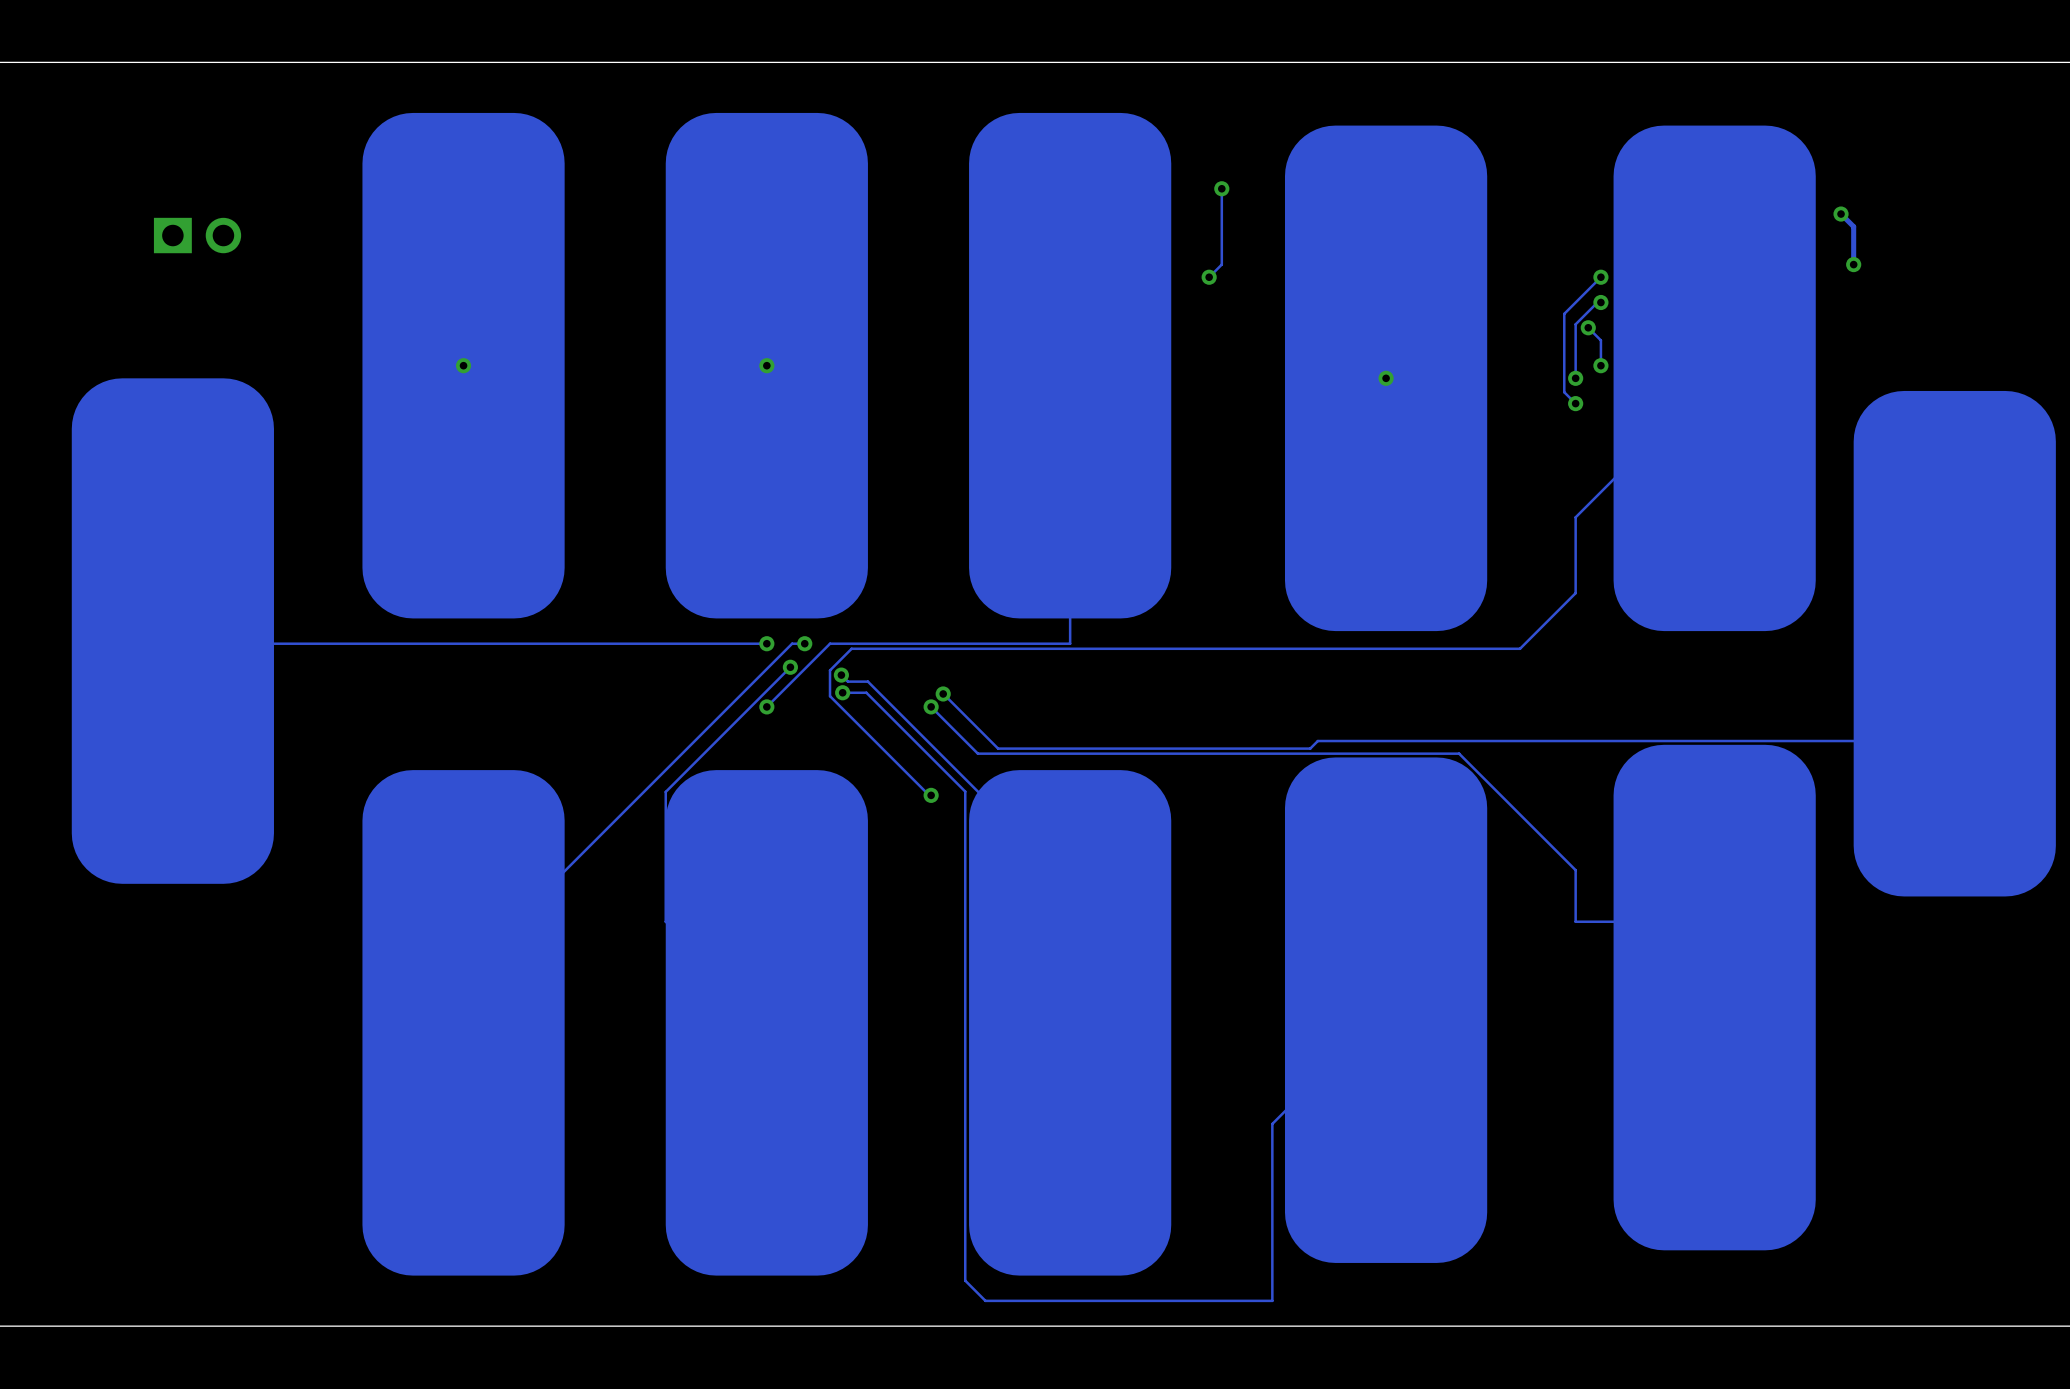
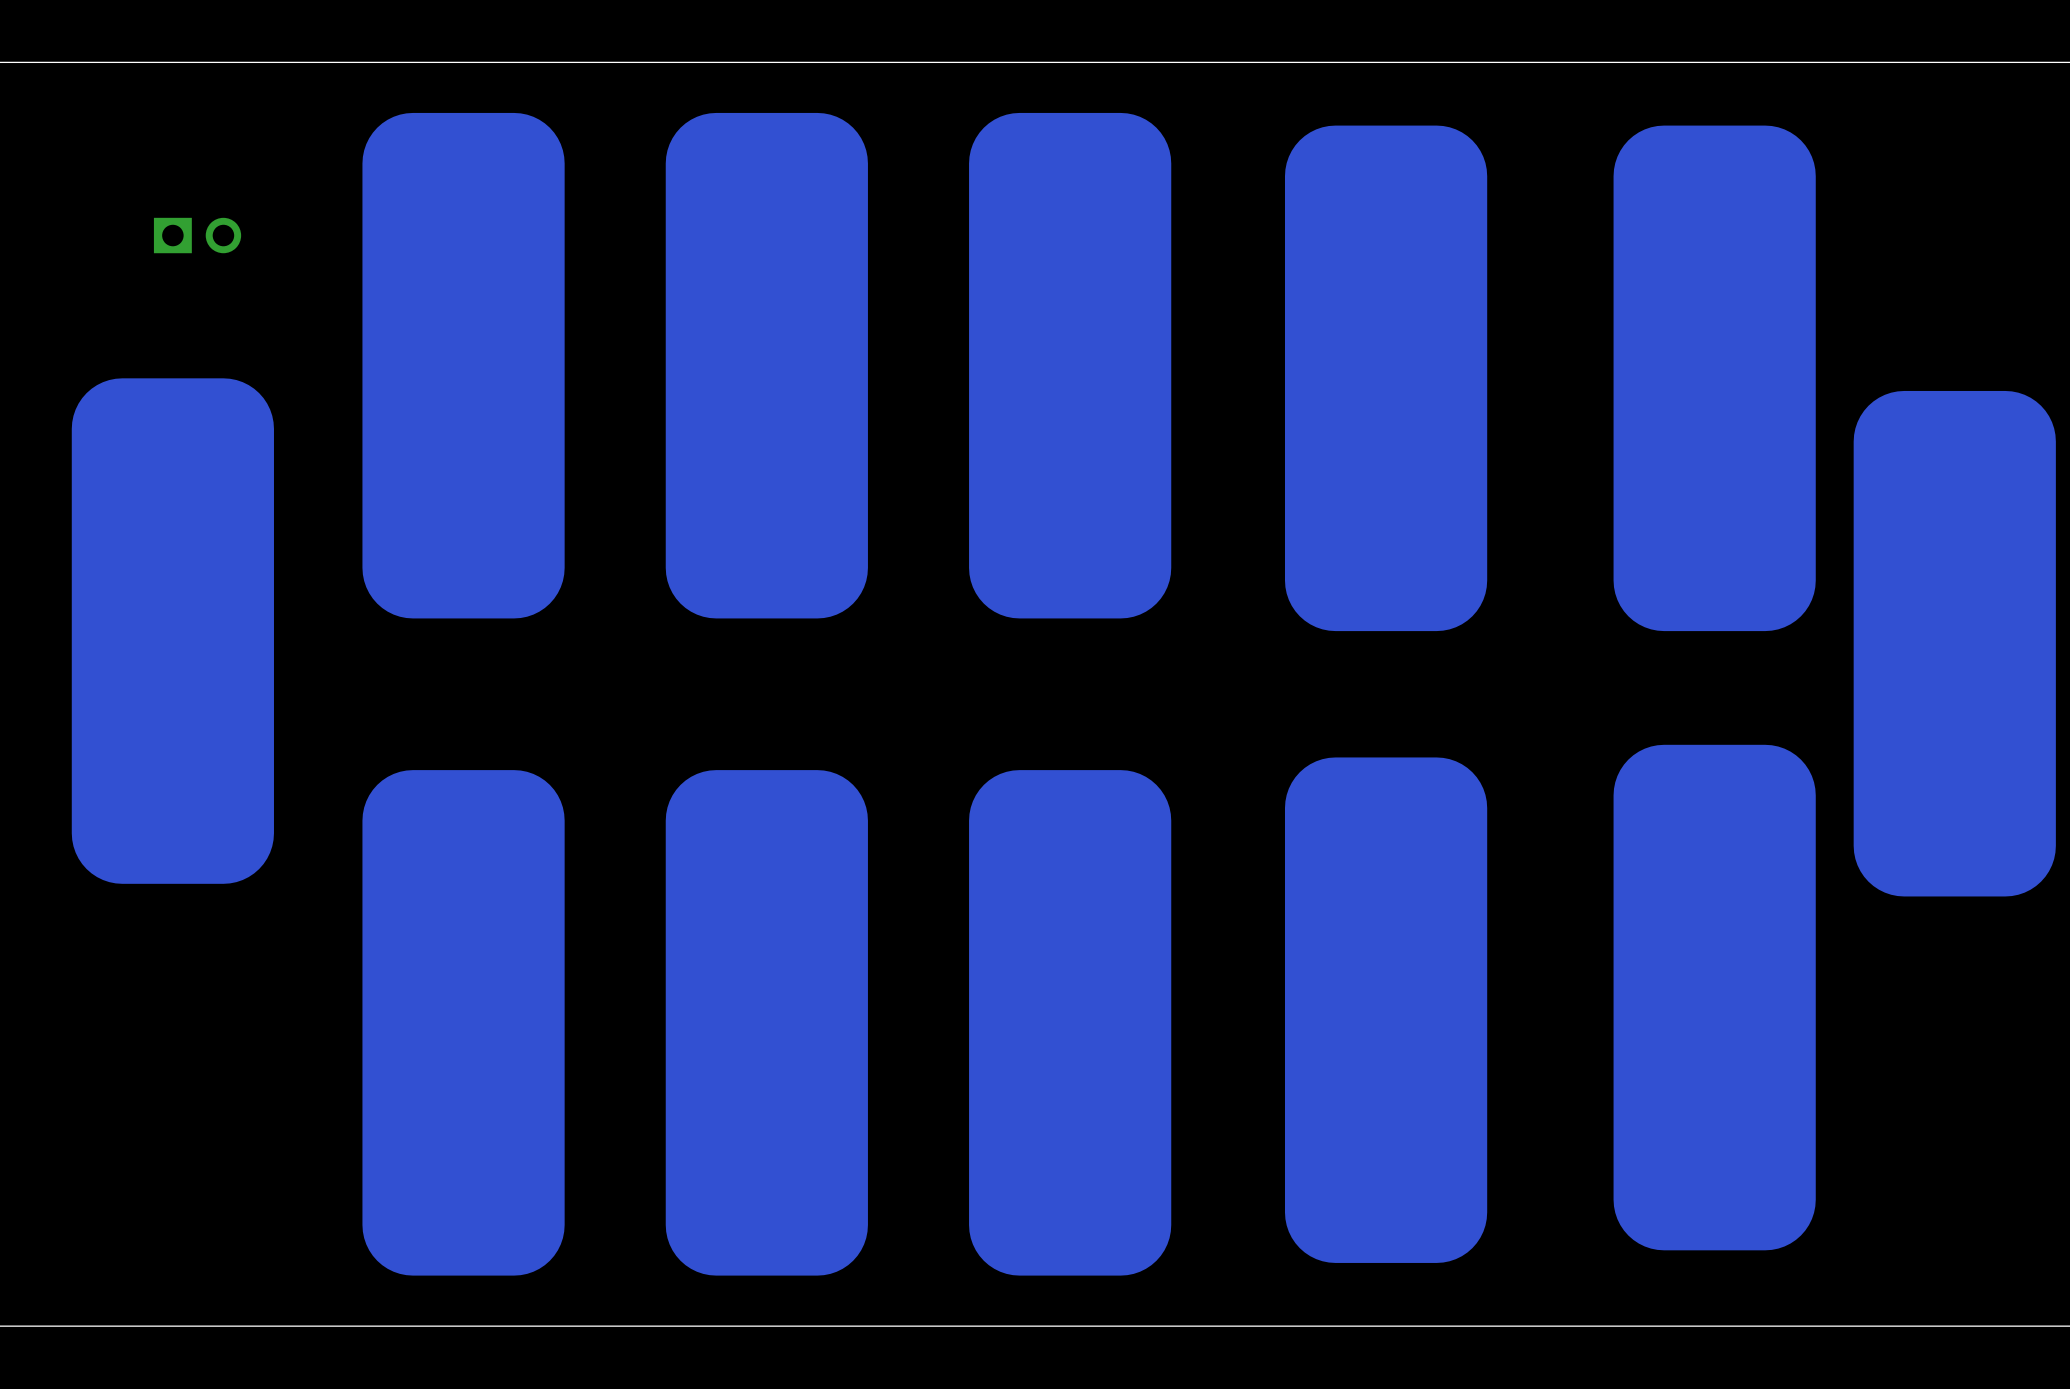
track: (1221, 188) (1221, 264) (1209, 277) -> none
via: (1221, 188) -> none
track: (1841, 214) (1853, 226) (1853, 264) -> none
via: (1841, 214) -> none
via: (1853, 264) -> none
via: (1209, 277) -> none
track: (1600, 277) (1564, 313) (1564, 392) (1575, 403) -> none
via: (1600, 277) -> none
track: (1600, 302) (1597, 302) (1575, 324) (1575, 378) -> none
via: (1600, 302) -> none
track: (1588, 327) (1600, 340) (1600, 365) -> none
via: (1588, 327) -> none
via: (463, 365) -> none
via: (766, 365) -> none
track: (1070, 365) (1070, 643) (830, 643) (766, 706) -> none
via: (1600, 365) -> none
via: (1386, 378) -> none
via: (1575, 378) -> none
track: (1714, 378) (1575, 517) (1575, 593) (1520, 648) (851, 648) (830, 670) (830, 696) (931, 795) -> none
via: (1575, 403) -> none
track: (172, 631) (185, 643) (766, 643) -> none
via: (766, 643) -> none
track: (804, 643) (792, 643) (463, 972) (463, 1022) -> none
via: (804, 643) -> none
track: (1954, 643) (1857, 741) (1317, 741) (1310, 748) (998, 748) (943, 693) -> none
track: (790, 667) (665, 791) (665, 921) (766, 1022) -> none
via: (790, 667) -> none
track: (841, 675) (847, 681) (867, 681) (1070, 883) (1070, 1022) -> none
via: (841, 675) -> none
track: (842, 692) (866, 692) (965, 791) (965, 1280) (985, 1300) (1272, 1300) (1272, 1123) (1386, 1010) -> none
via: (842, 692) -> none
via: (943, 693) -> none
via: (766, 706) -> none
track: (931, 706) (977, 753) (1459, 753) (1575, 870) (1575, 921) (1638, 921) (1714, 997) -> none
via: (931, 706) -> none
via: (931, 795) -> none

